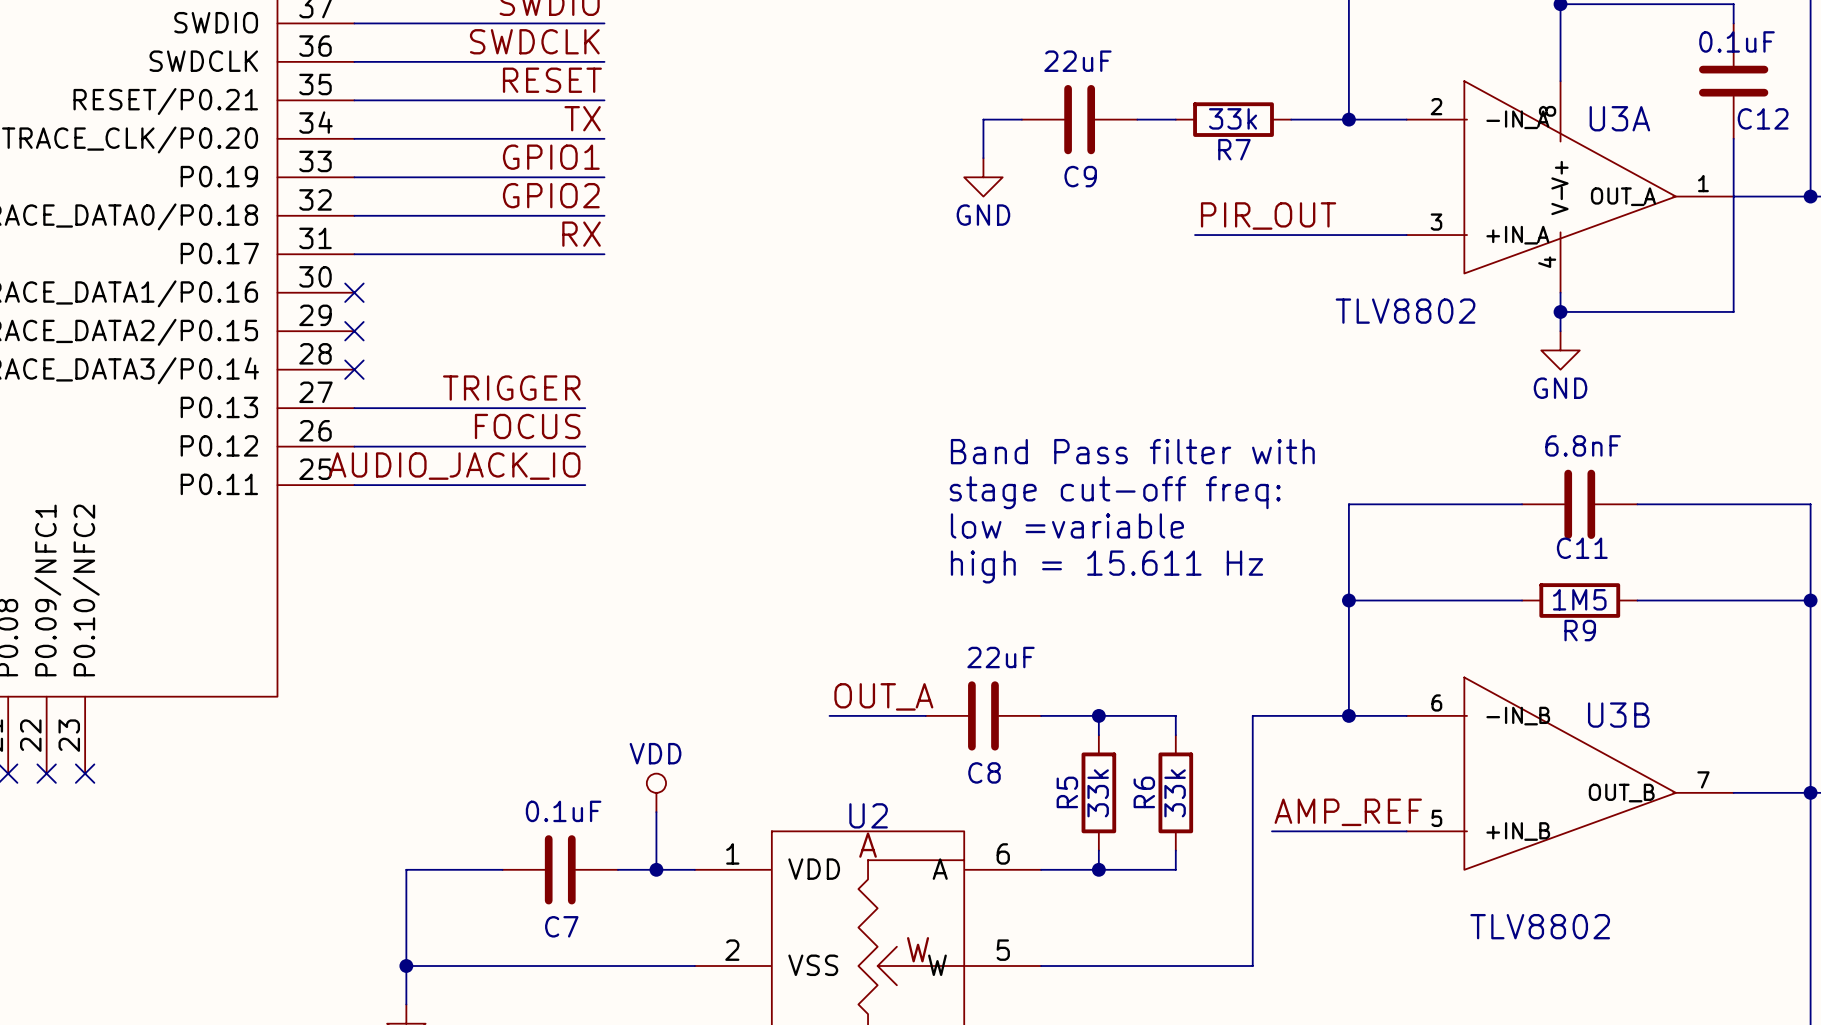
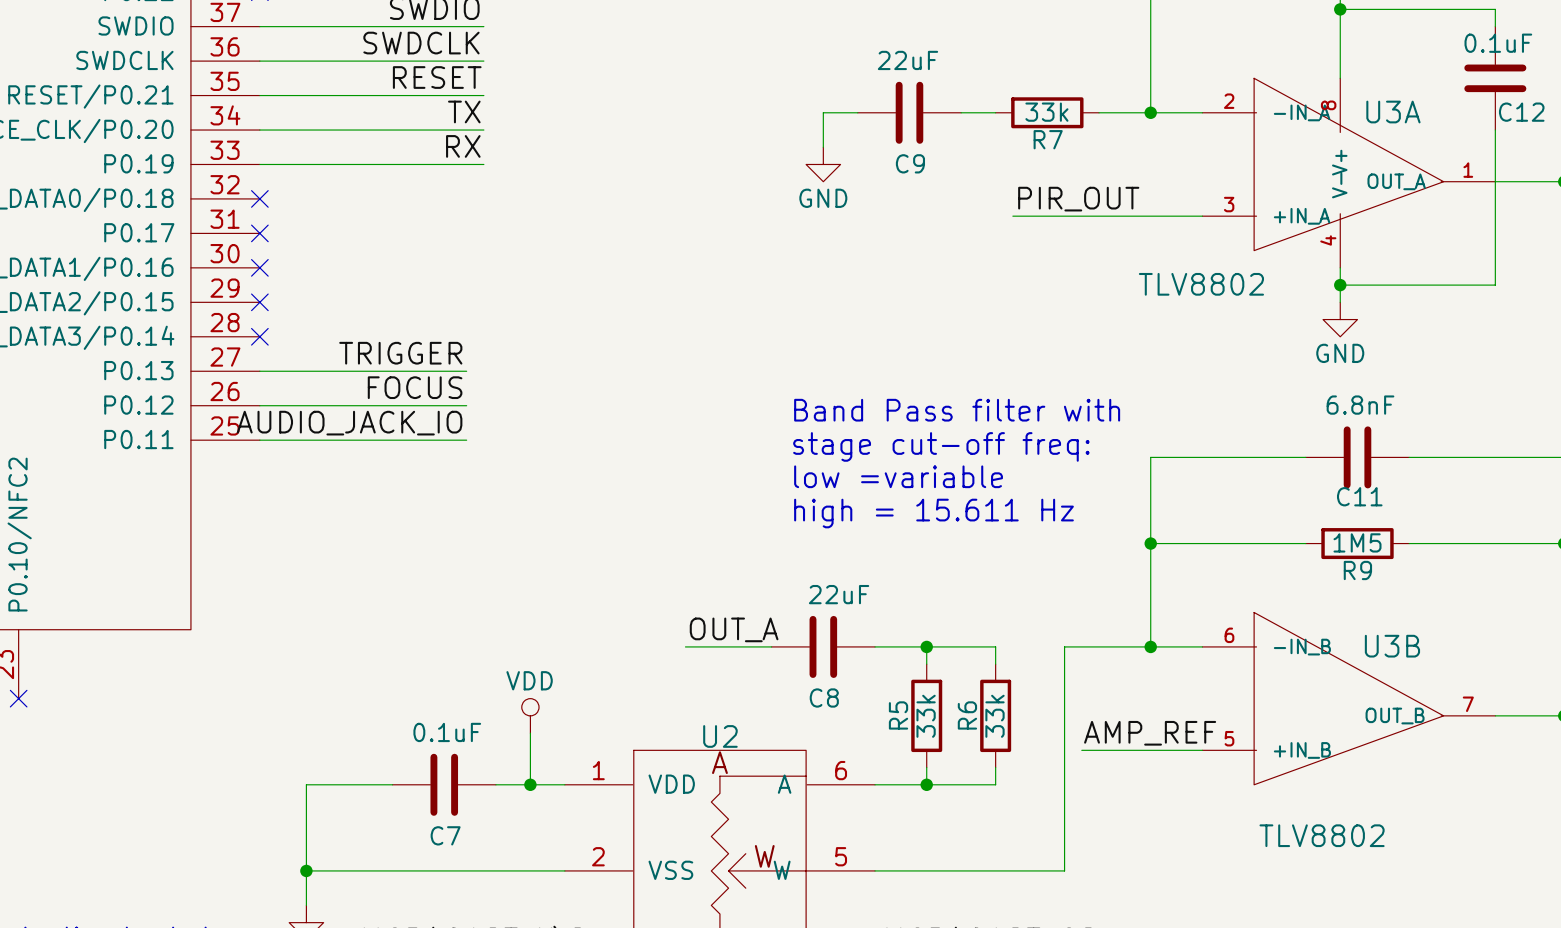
label: GPIO1 (551, 157) -> RX (463, 146)
label: GPIO2 (551, 195) -> none
wire: (354, 215) (604, 215) -> none
no-connect mark: none -> (259, 198)
label: RX (581, 234) -> none
wire: (354, 254) (604, 254) -> none
no-connect mark: none -> (259, 233)

